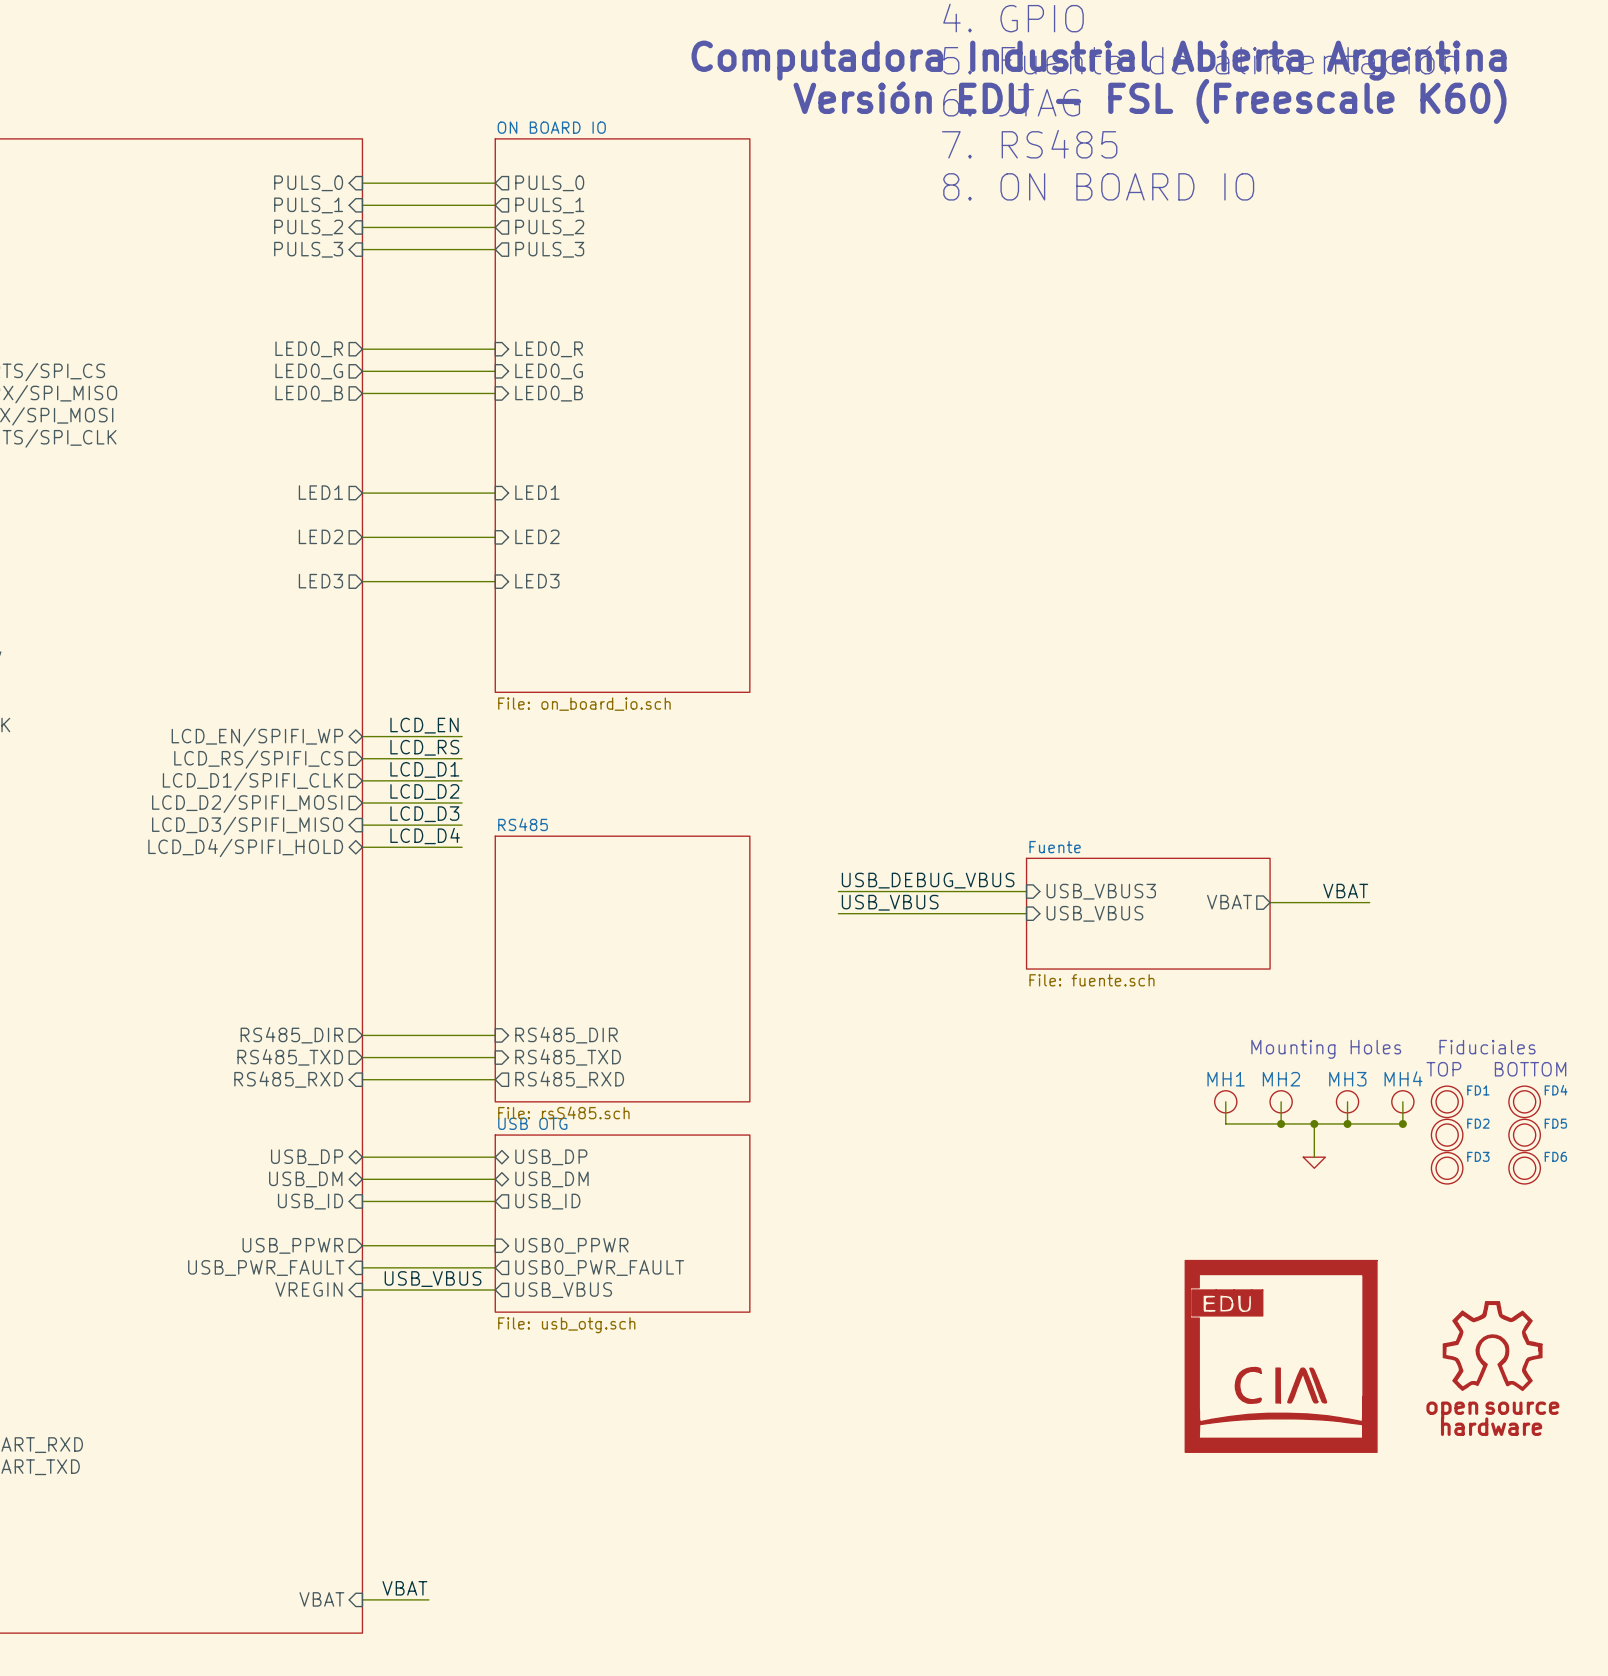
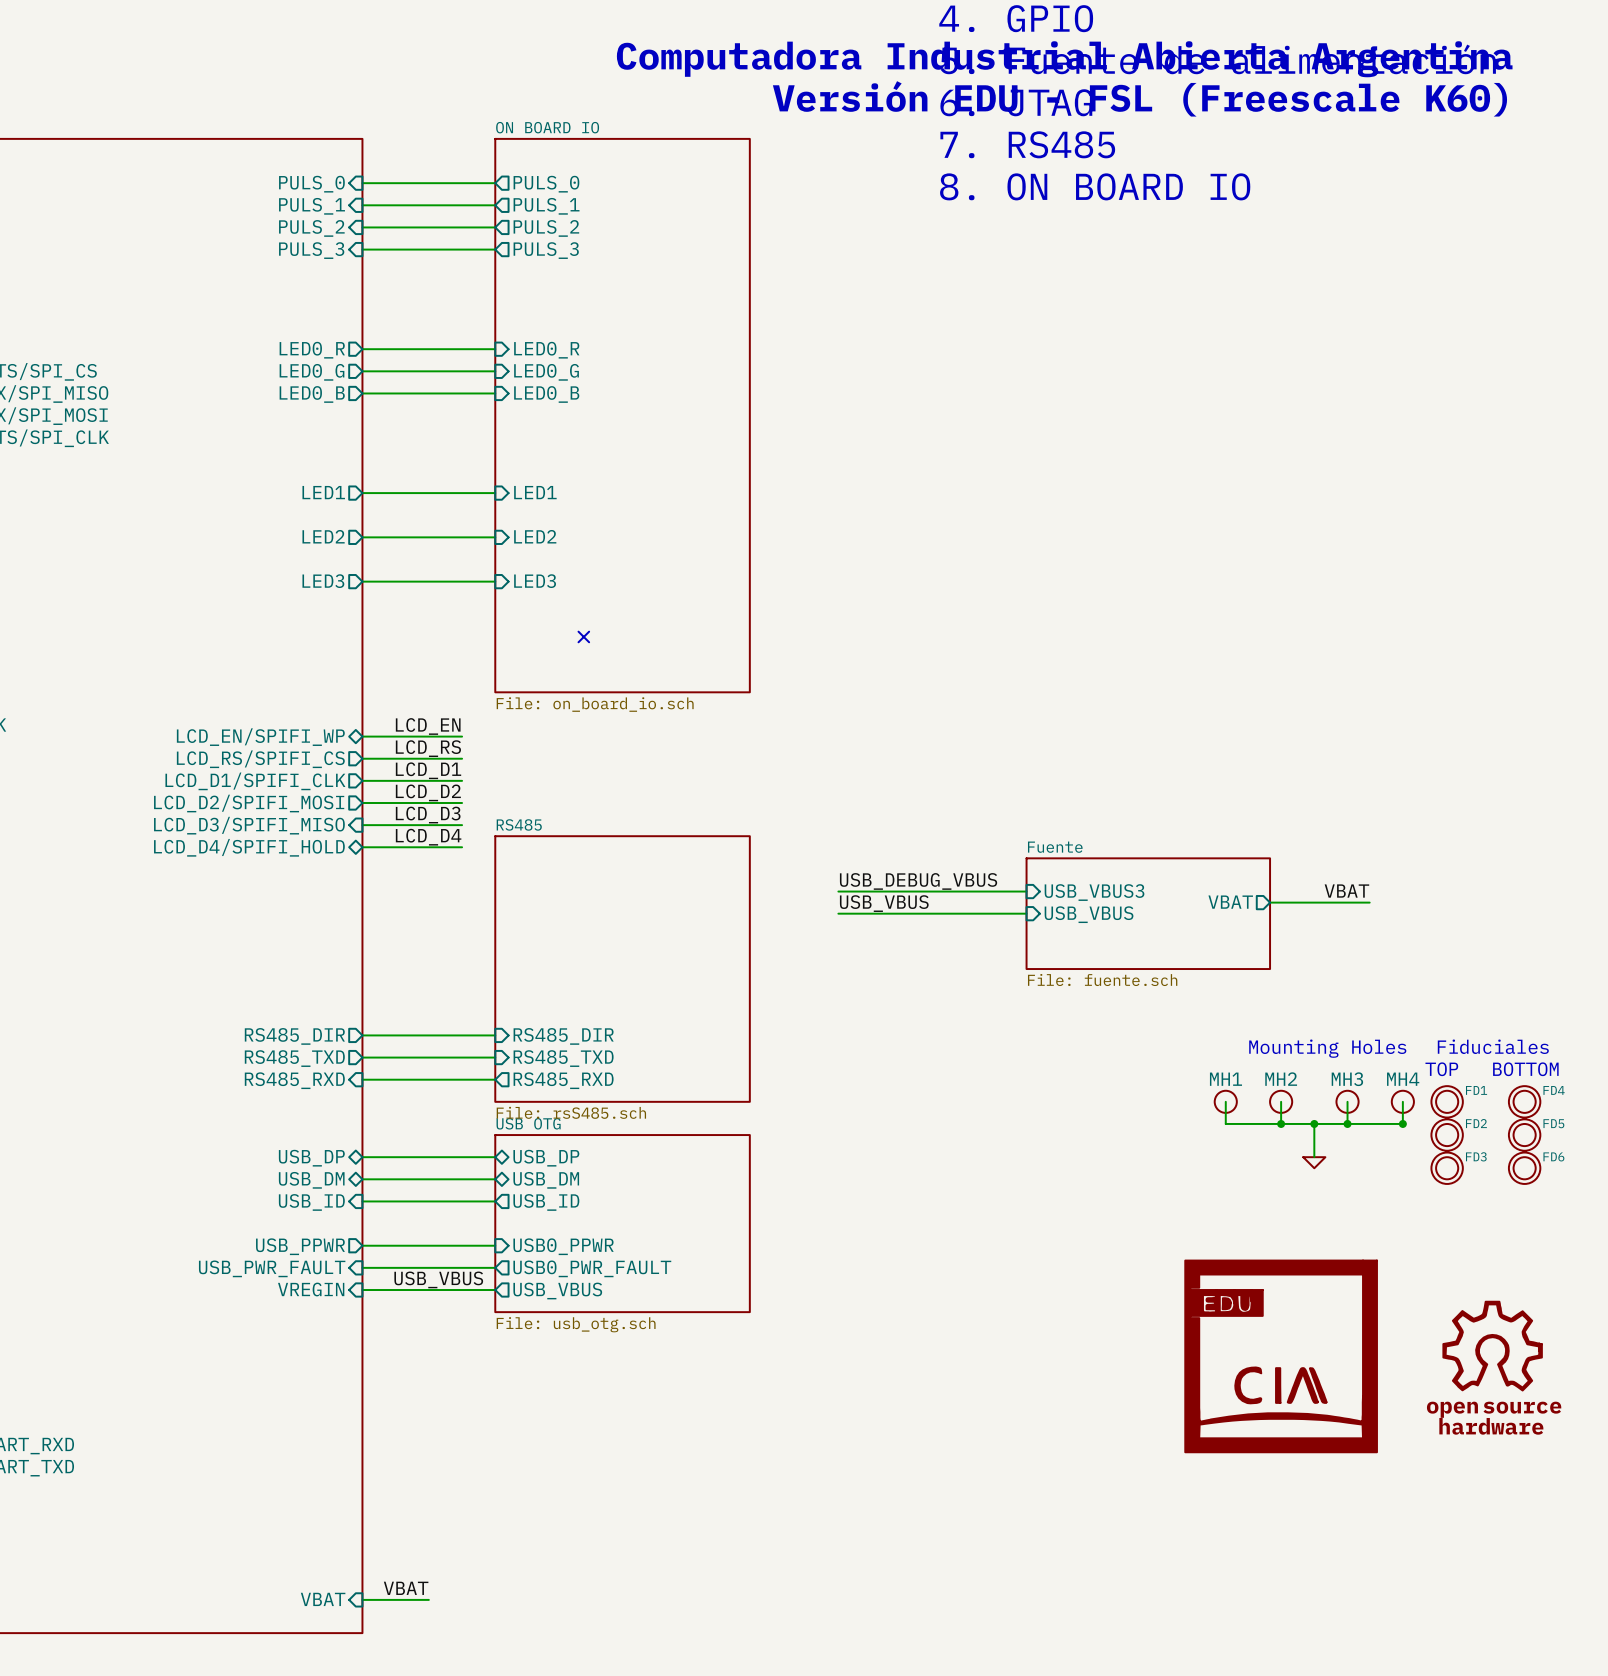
no-connect mark: none -> (583, 636)

